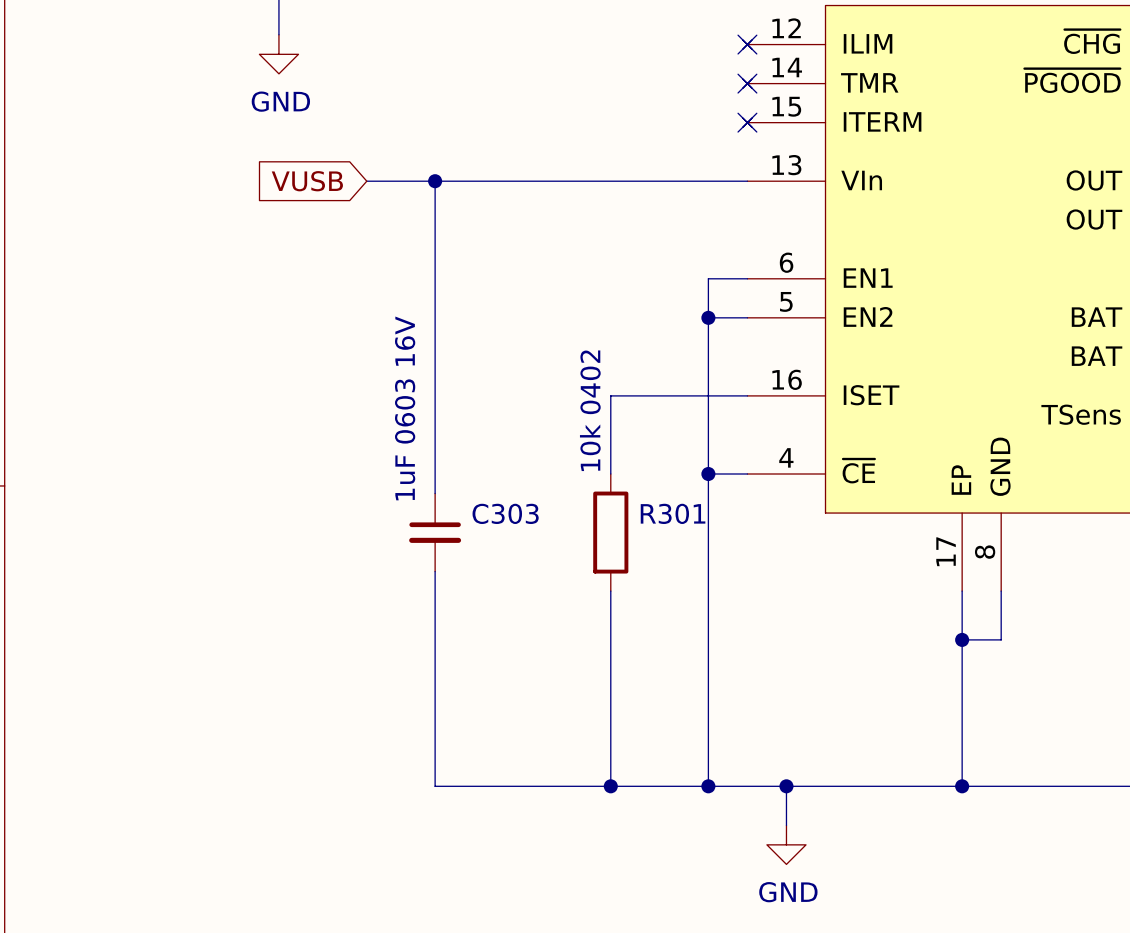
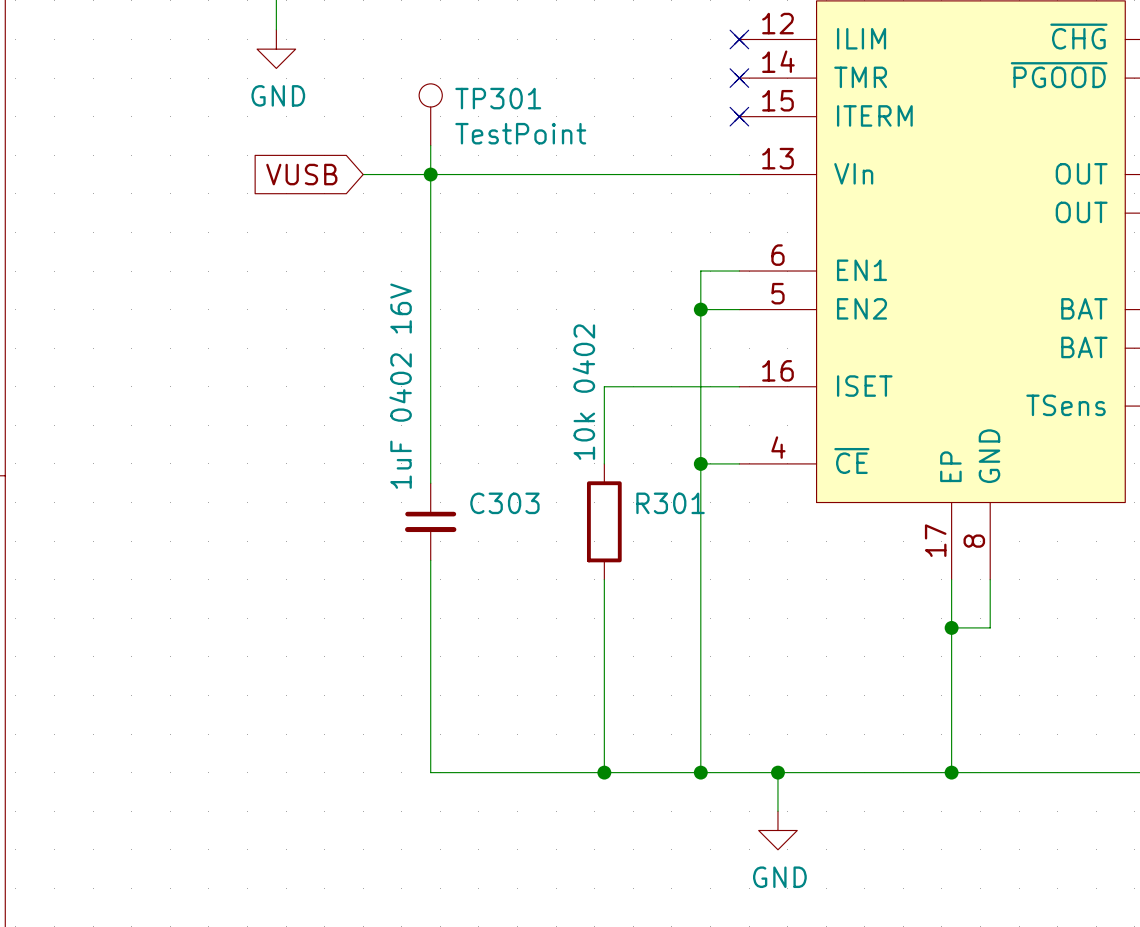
TP301: none -> TestPoint (430, 114)
wire: none -> (430, 145) (430, 174)
C303 value: 1uF 0603 16V (405, 408) -> 1uF 0402 16V (400, 386)

